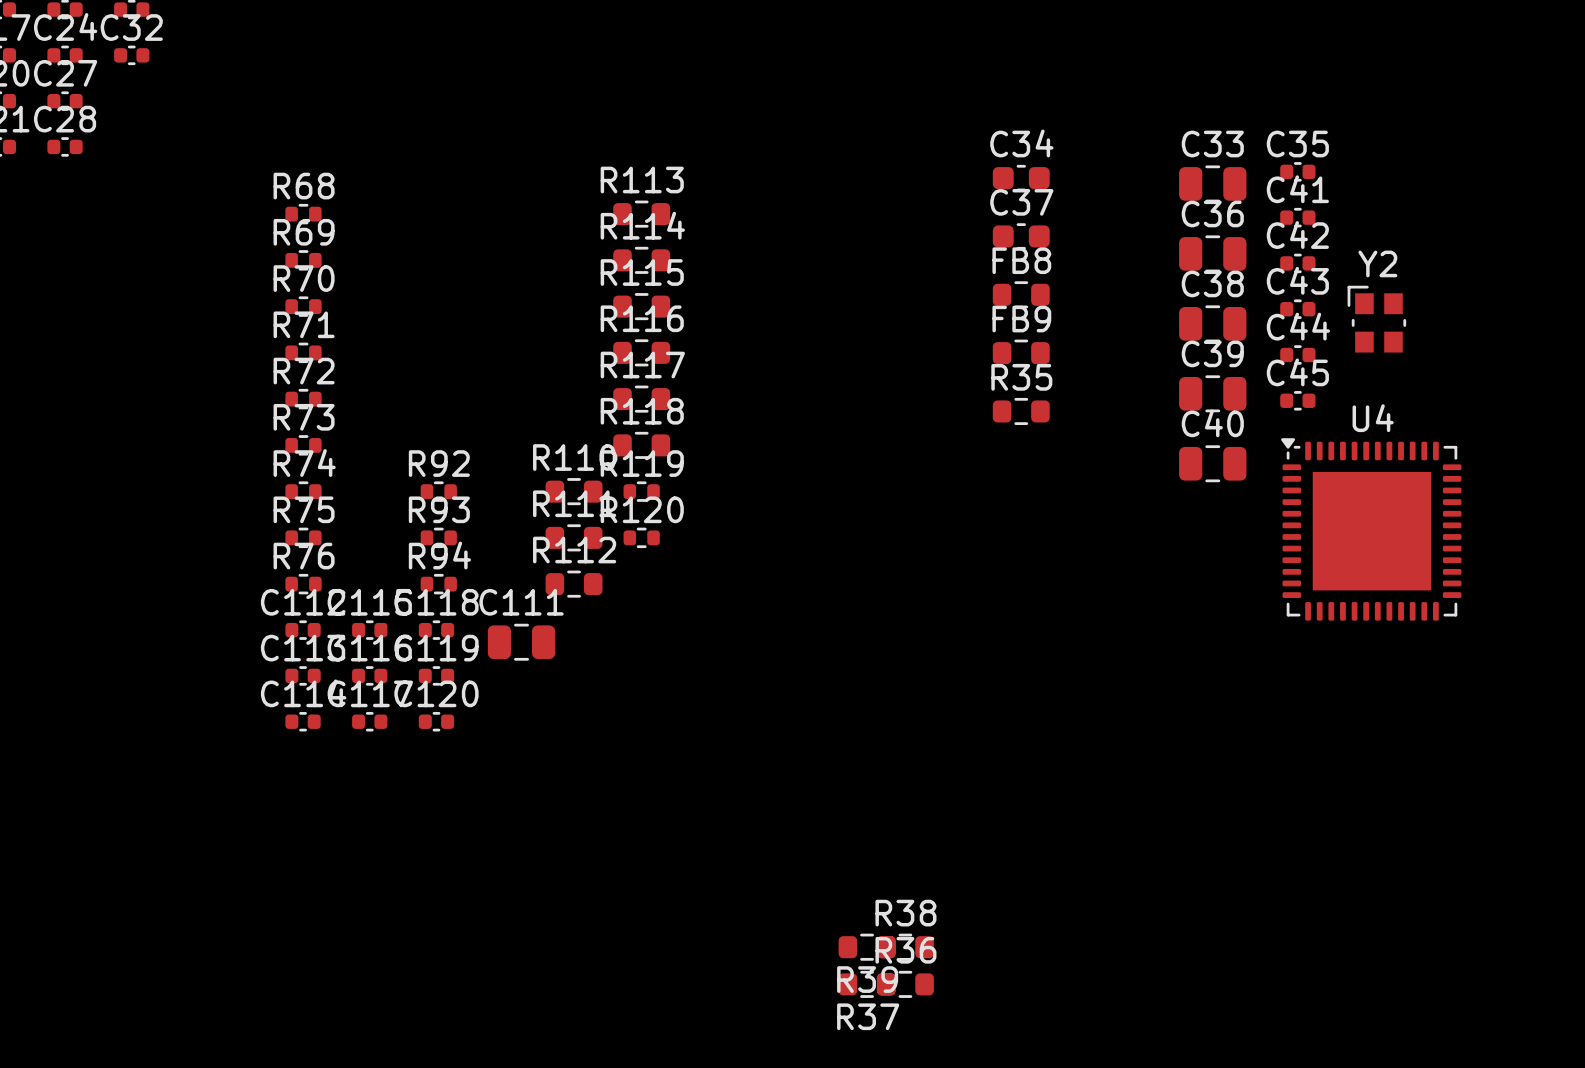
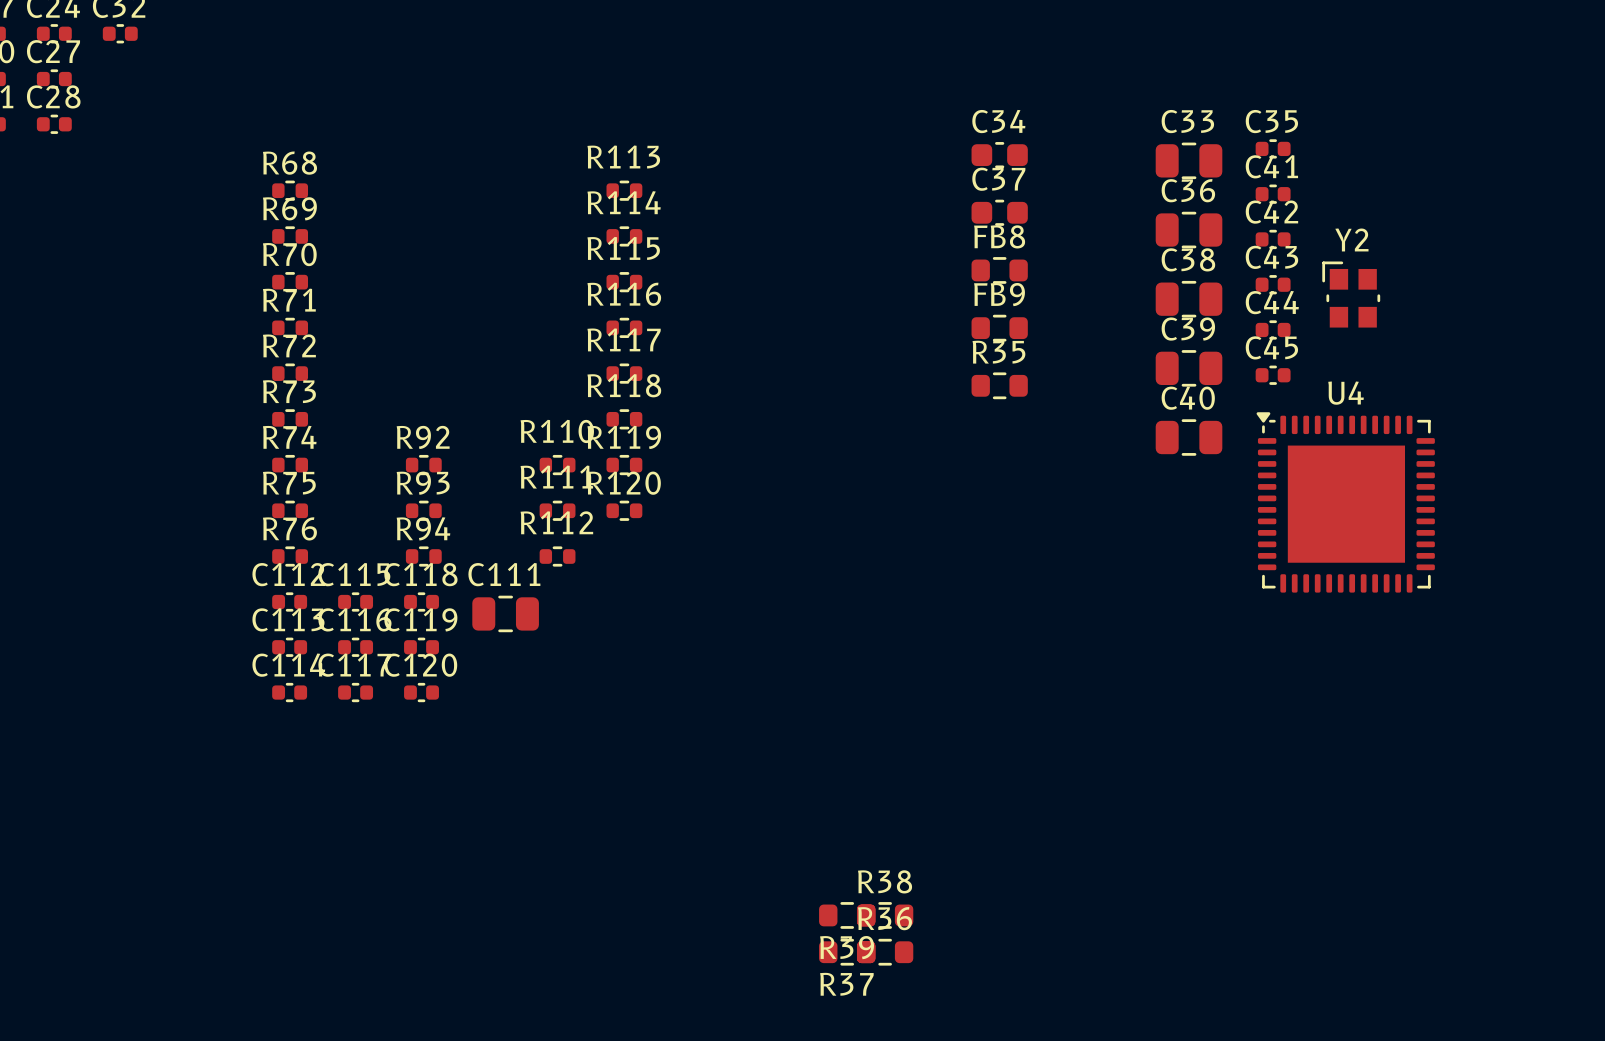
R113 footprint: [613, 200, 671, 228] -> [606, 180, 643, 201]
R114 footprint: [613, 246, 671, 274] -> [606, 226, 643, 247]
R115 footprint: [613, 293, 671, 321] -> [606, 272, 643, 293]
R116 footprint: [613, 339, 671, 367] -> [606, 317, 643, 338]
R117 footprint: [613, 385, 671, 413] -> [606, 363, 643, 384]
R118 footprint: [613, 431, 671, 459] -> [606, 409, 643, 430]
R110 footprint: [545, 478, 603, 506] -> [539, 454, 576, 476]
R111 footprint: [545, 524, 603, 552] -> [539, 500, 576, 521]
R112 footprint: [545, 570, 603, 598] -> [539, 546, 576, 567]

